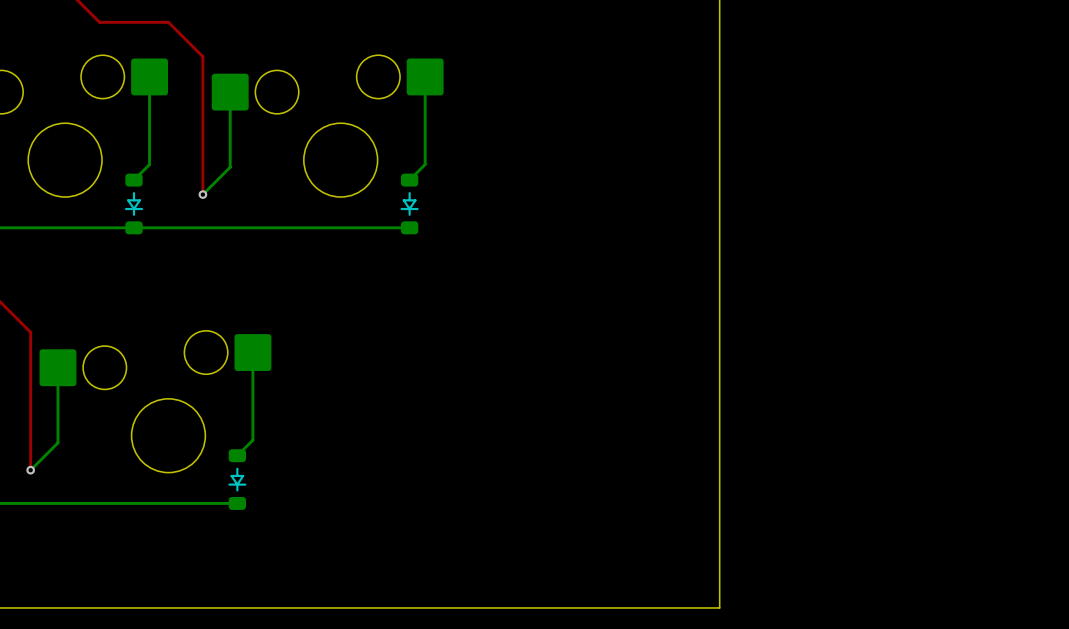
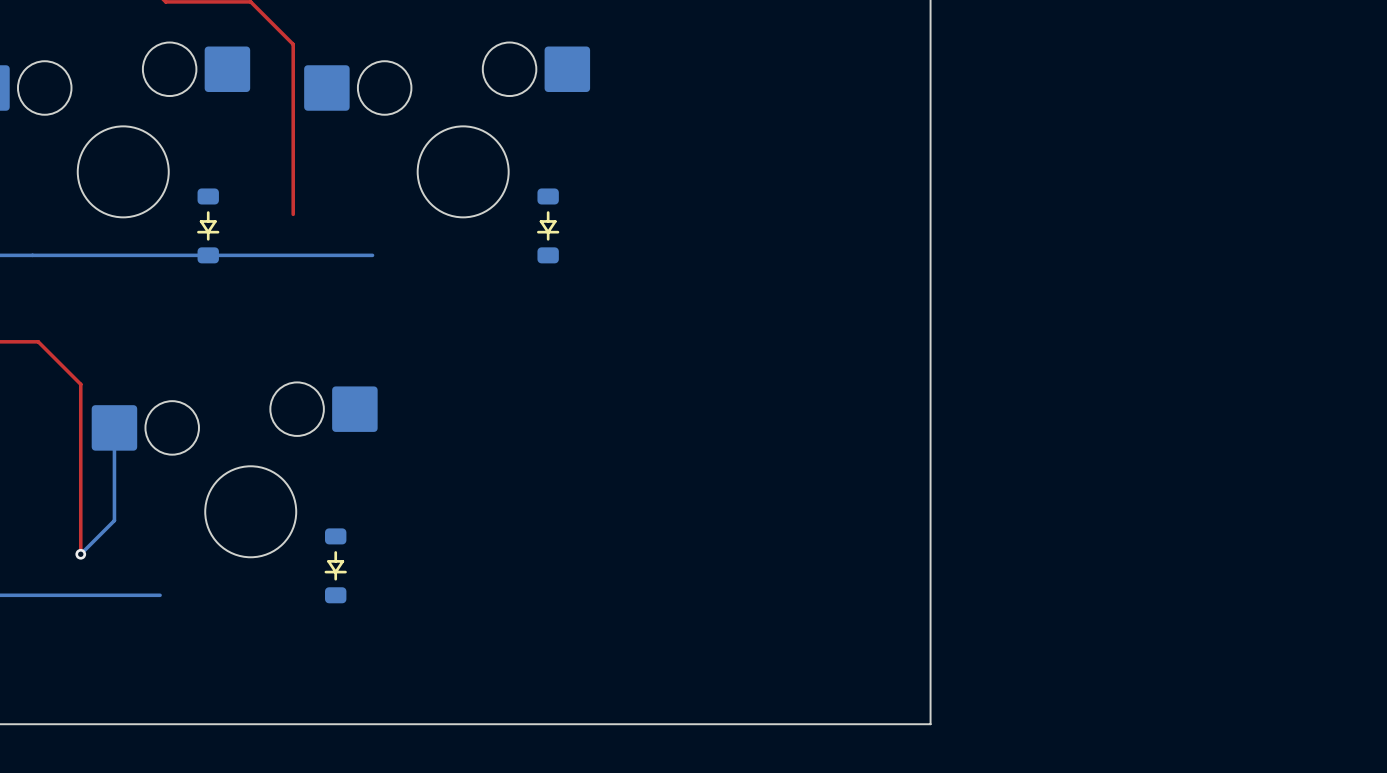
bottom track: (149, 76) (149, 164) (134, 180) -> none
bottom track: (425, 76) (425, 164) (409, 180) -> none
bottom track: (230, 92) (230, 167) (202, 194) -> none
via: (202, 194) -> none
bottom track: (409, 227) (267, 227) -> none
bottom track: (252, 352) (252, 440) (237, 455) -> none
bottom track: (237, 503) (94, 503) -> none

